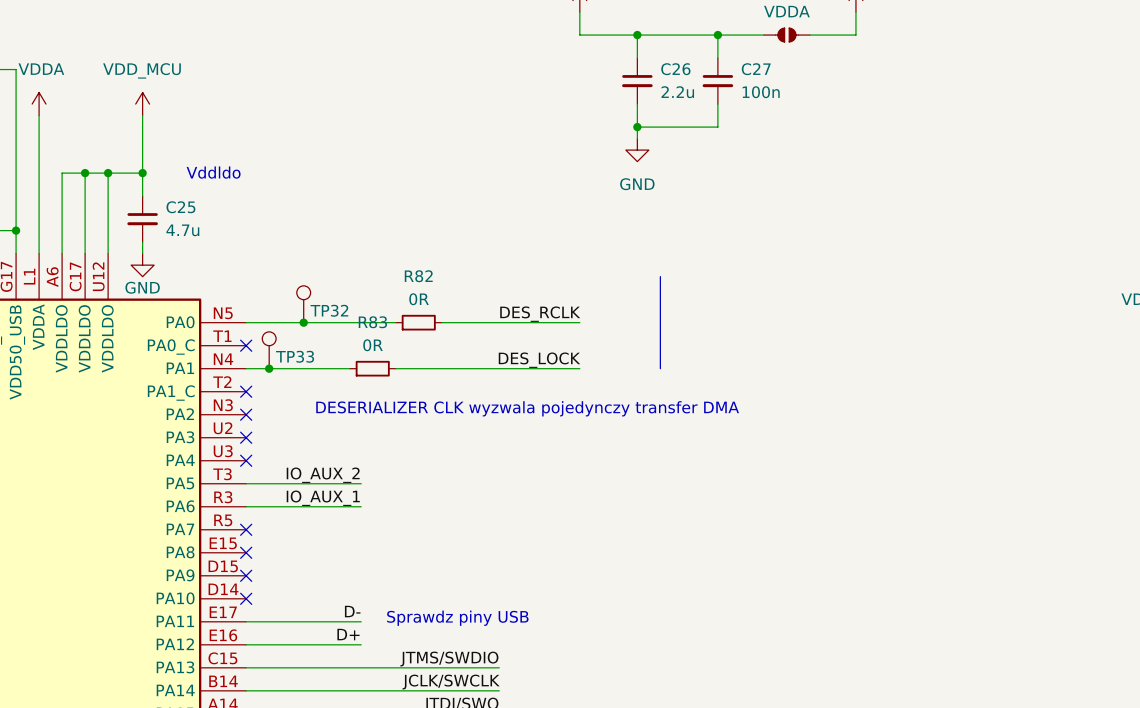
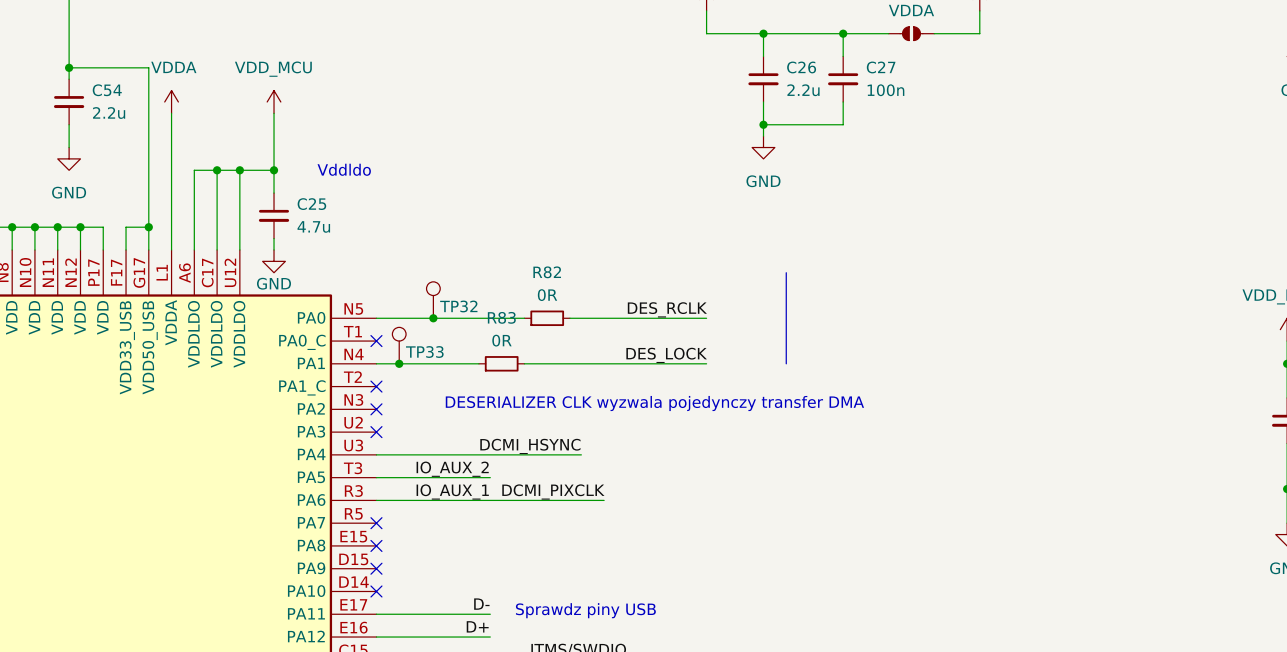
label: none -> DCMI_HSYNC (530, 446)
wire: none -> (376, 454) (581, 454)
no-connect mark: (246, 460) -> none
label: none -> DCMI_PIXCLK (553, 491)
wire: none -> (490, 500) (604, 500)

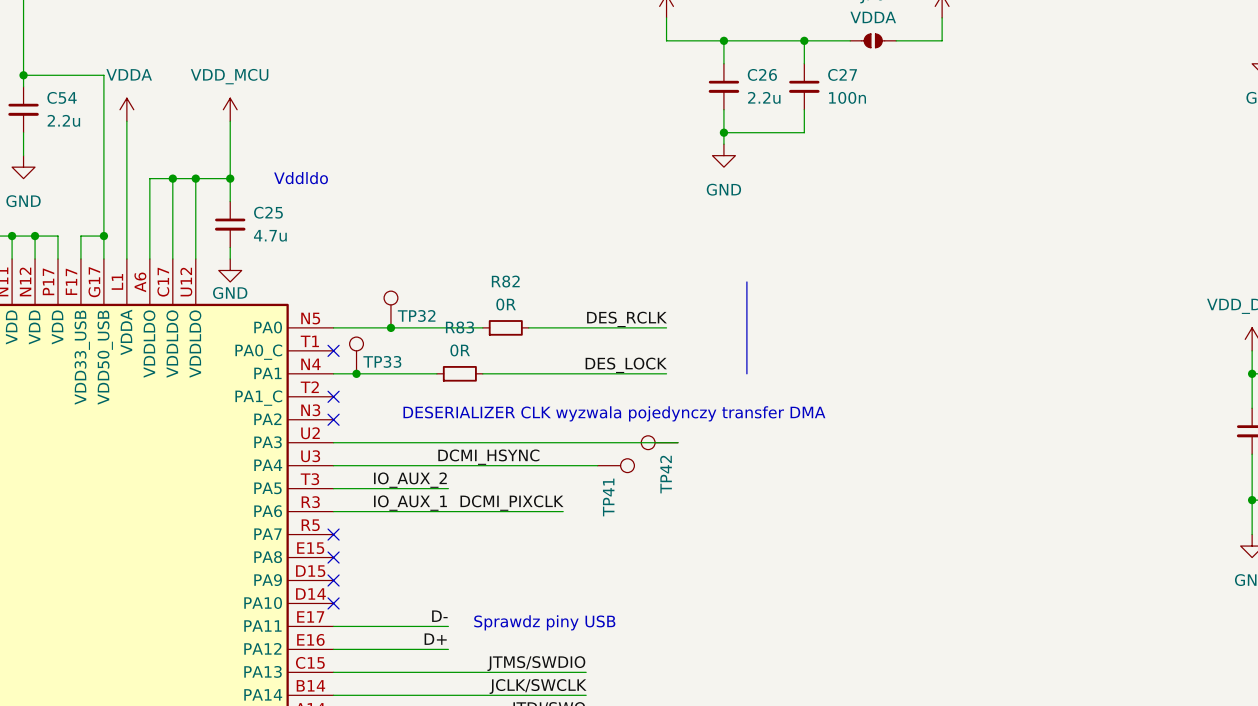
wire: none -> (333, 442) (678, 442)
no-connect mark: (376, 432) -> none
TP42: none -> (659, 442)
wire: none -> (540, 465) (597, 465)
TP41: none -> (616, 465)

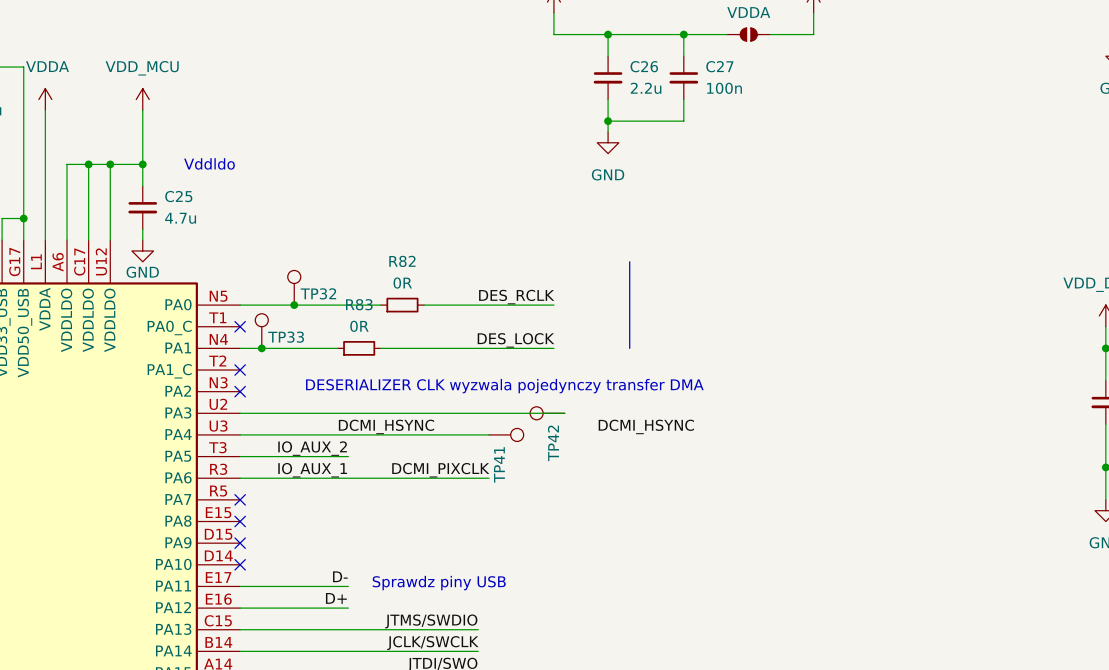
label: none -> DCMI_HSYNC (646, 426)
label position: DCMI_PIXCLK (512, 503) -> DCMI_PIXCLK (440, 470)
wire: none -> (456, 478) (489, 478)

